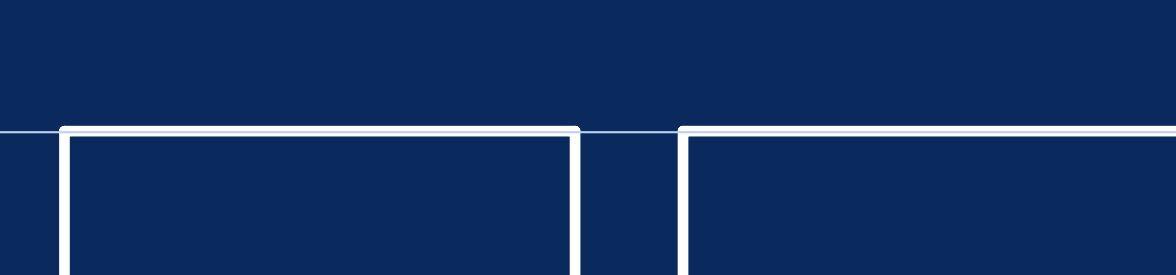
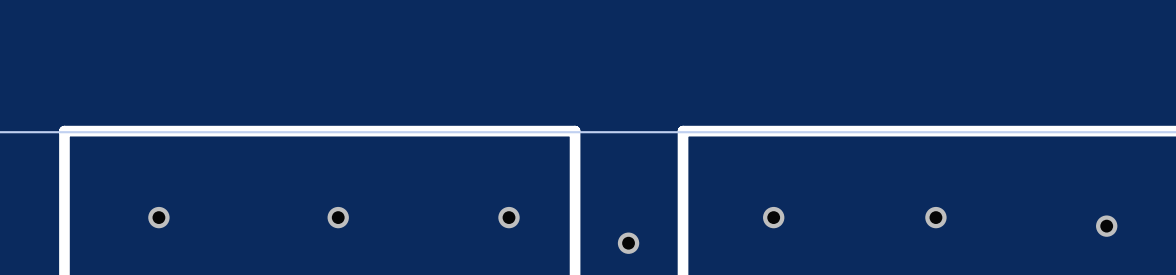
via: none -> (158, 217)
via: none -> (338, 217)
via: none -> (509, 217)
via: none -> (773, 217)
via: none -> (935, 217)
via: none -> (1106, 226)
via: none -> (628, 243)

